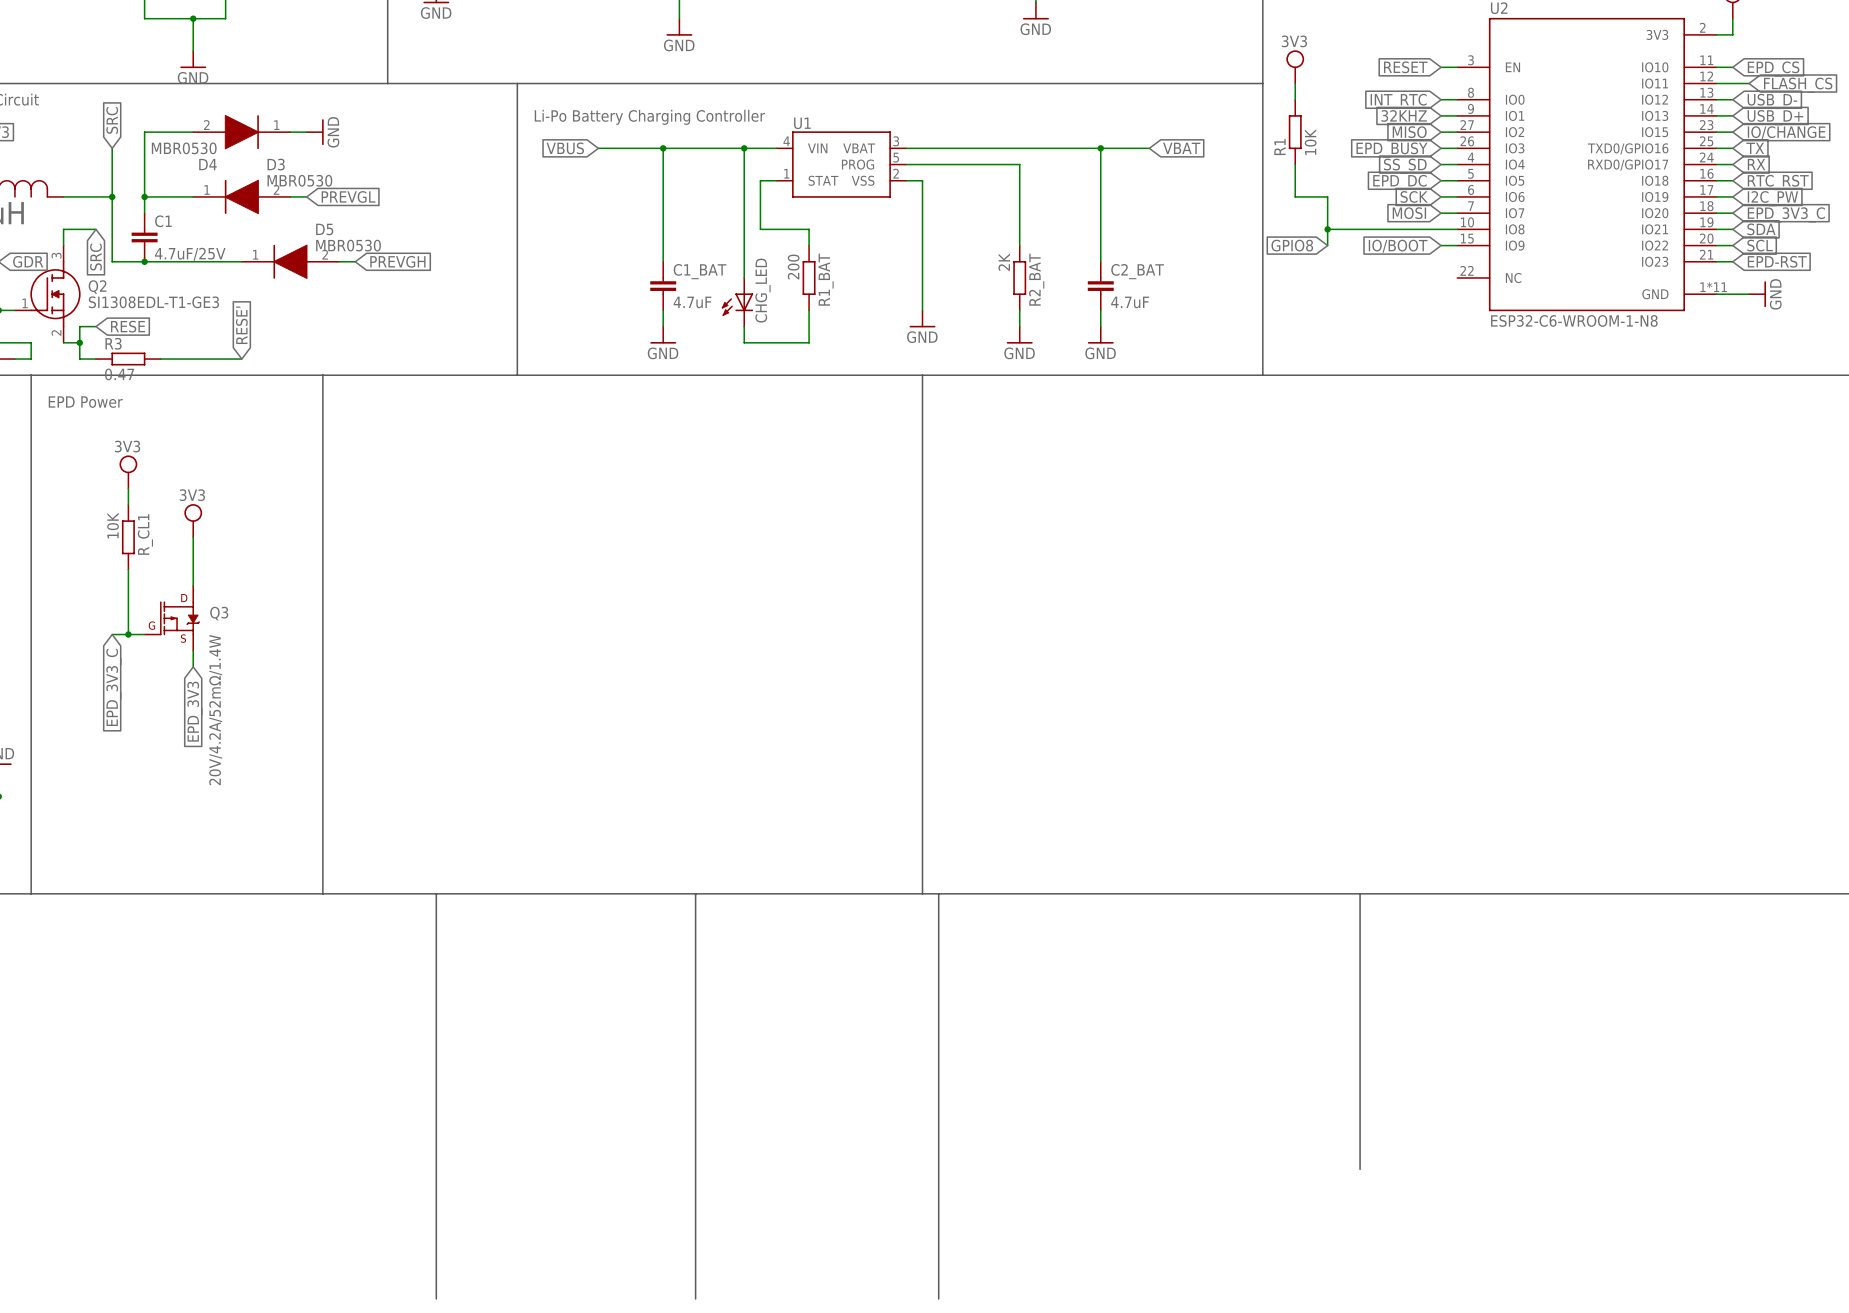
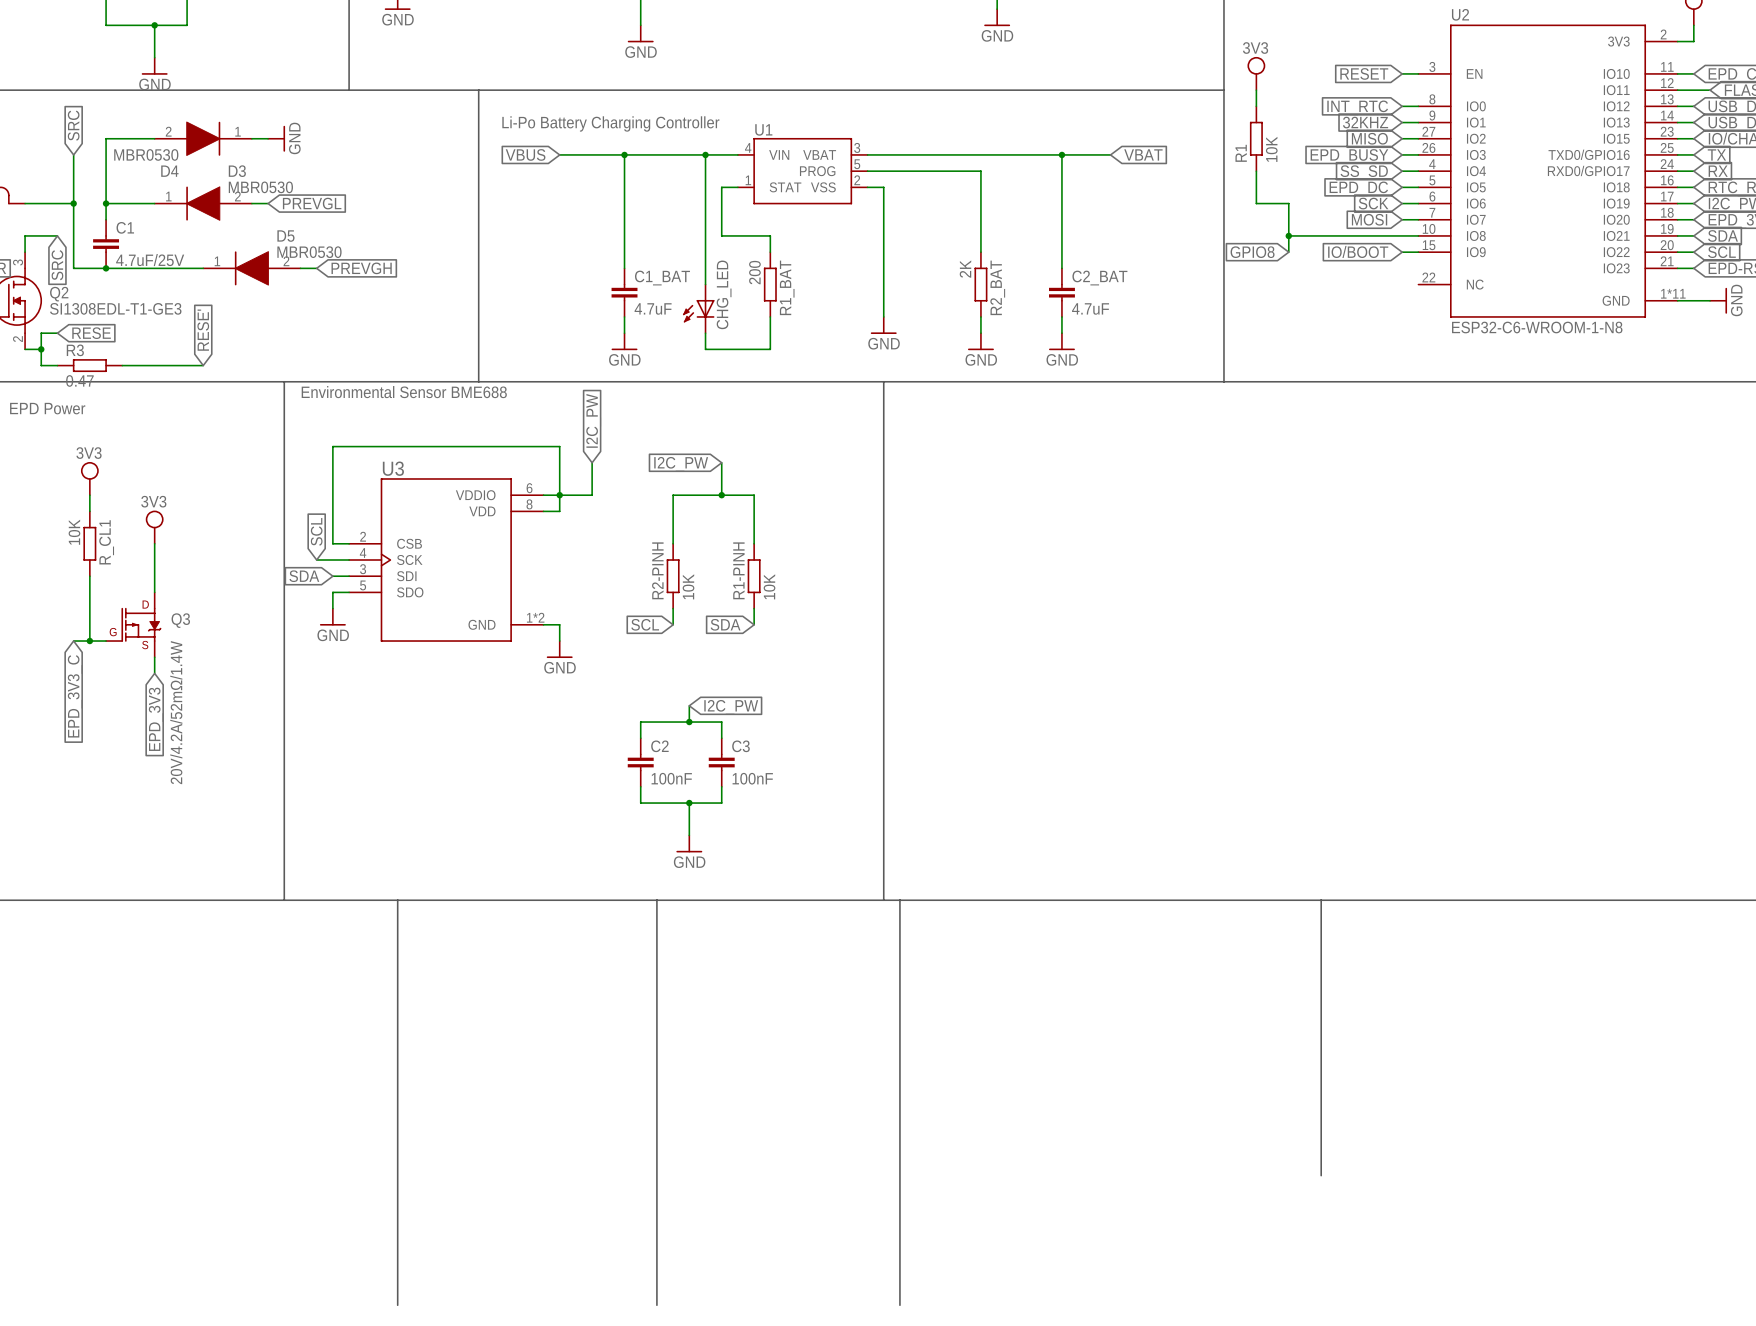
text: none -> Environmental Sensor BME688 (404, 392)
global label: none -> I2C_PW (593, 420)
wire: none -> (592, 462) (592, 495) (543, 495)
wire: none -> (721, 462) (721, 495)
global label: none -> I2C_PW (681, 464)
junction: none -> (559, 495)
junction: none -> (721, 495)
wire: none -> (543, 511) (559, 511) (559, 446) (332, 446) (332, 543) (349, 543)
global label: none -> SCL (316, 531)
wire: none -> (673, 543) (673, 495) (754, 495) (754, 543)
wire: none -> (316, 560) (349, 560)
U3: none -> (446, 560)
global label: none -> SDA (304, 576)
wire: none -> (332, 576) (349, 576)
R2-PINH: none -> 10K (673, 576)
R1-PINH: none -> 10K (754, 576)
wire: none -> (349, 592) (332, 592) (332, 608)
wire: none -> (673, 608) (673, 624)
wire: none -> (754, 608) (754, 624)
power symbol: none -> GND (332, 617)
wire: none -> (543, 624) (559, 624) (559, 641)
global label: none -> SCL (645, 624)
global label: none -> SDA (725, 624)
power symbol: none -> GND (559, 649)
wire: none -> (689, 705) (689, 722)
global label: none -> I2C_PW (731, 707)
junction: none -> (689, 722)
wire: none -> (640, 738) (640, 722) (721, 722) (721, 738)
C2: none -> 100nF (640, 762)
C3: none -> 100nF (721, 762)
wire: none -> (640, 786) (640, 803) (721, 803) (721, 786)
wire: none -> (689, 803) (689, 835)
junction: none -> (689, 803)
power symbol: none -> GND (689, 843)

